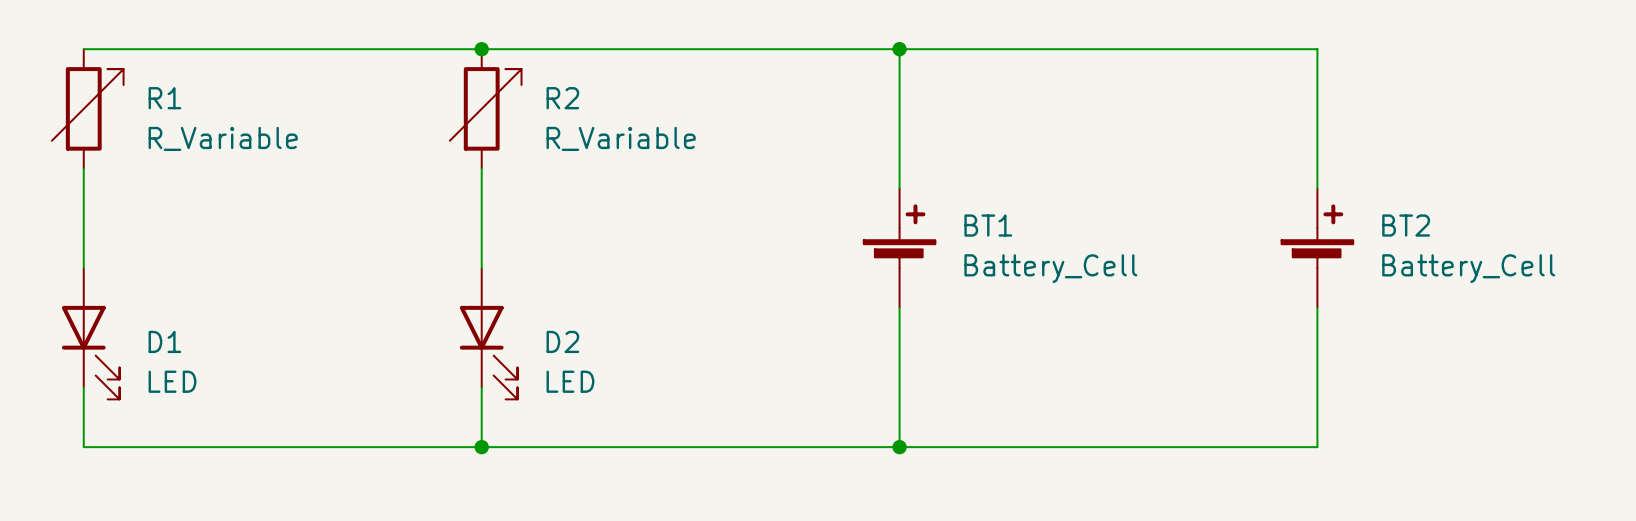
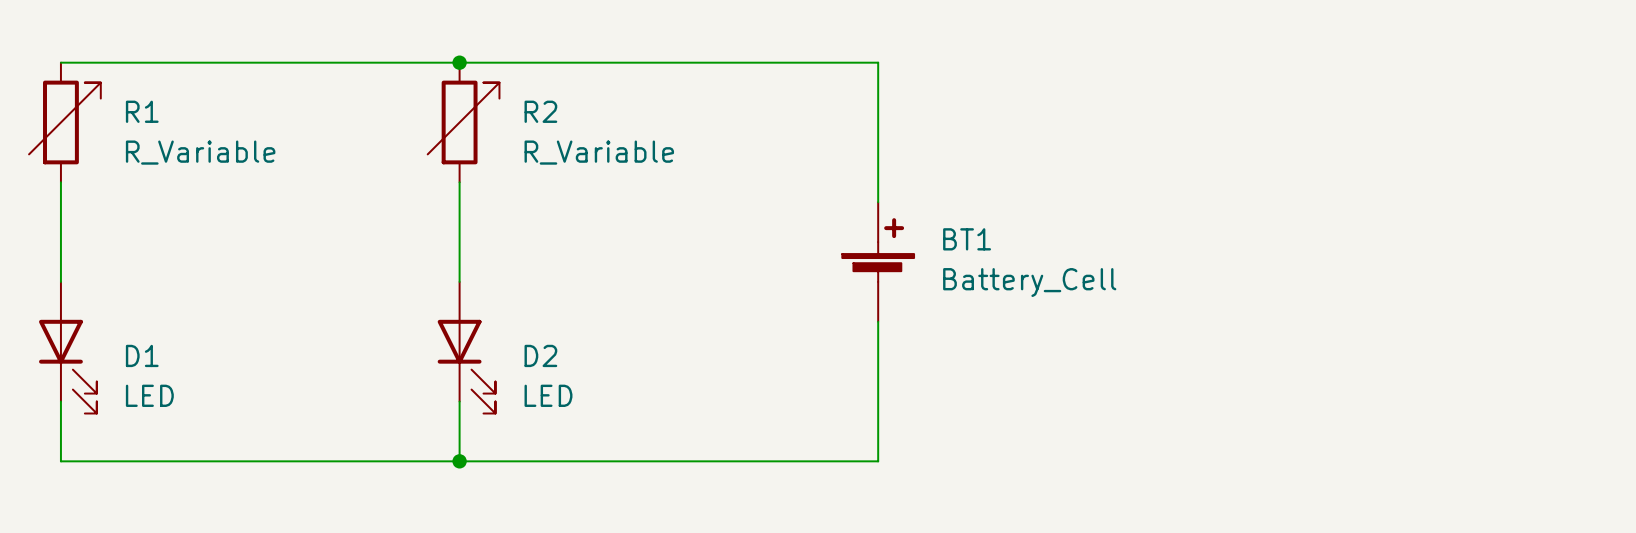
wire: (899, 49) (1317, 49) (1317, 188) -> none
junction: (899, 49) -> none
BT2: Battery_Cell (1317, 248) -> none
wire: (1317, 307) (1317, 447) (899, 447) -> none
junction: (899, 447) -> none

